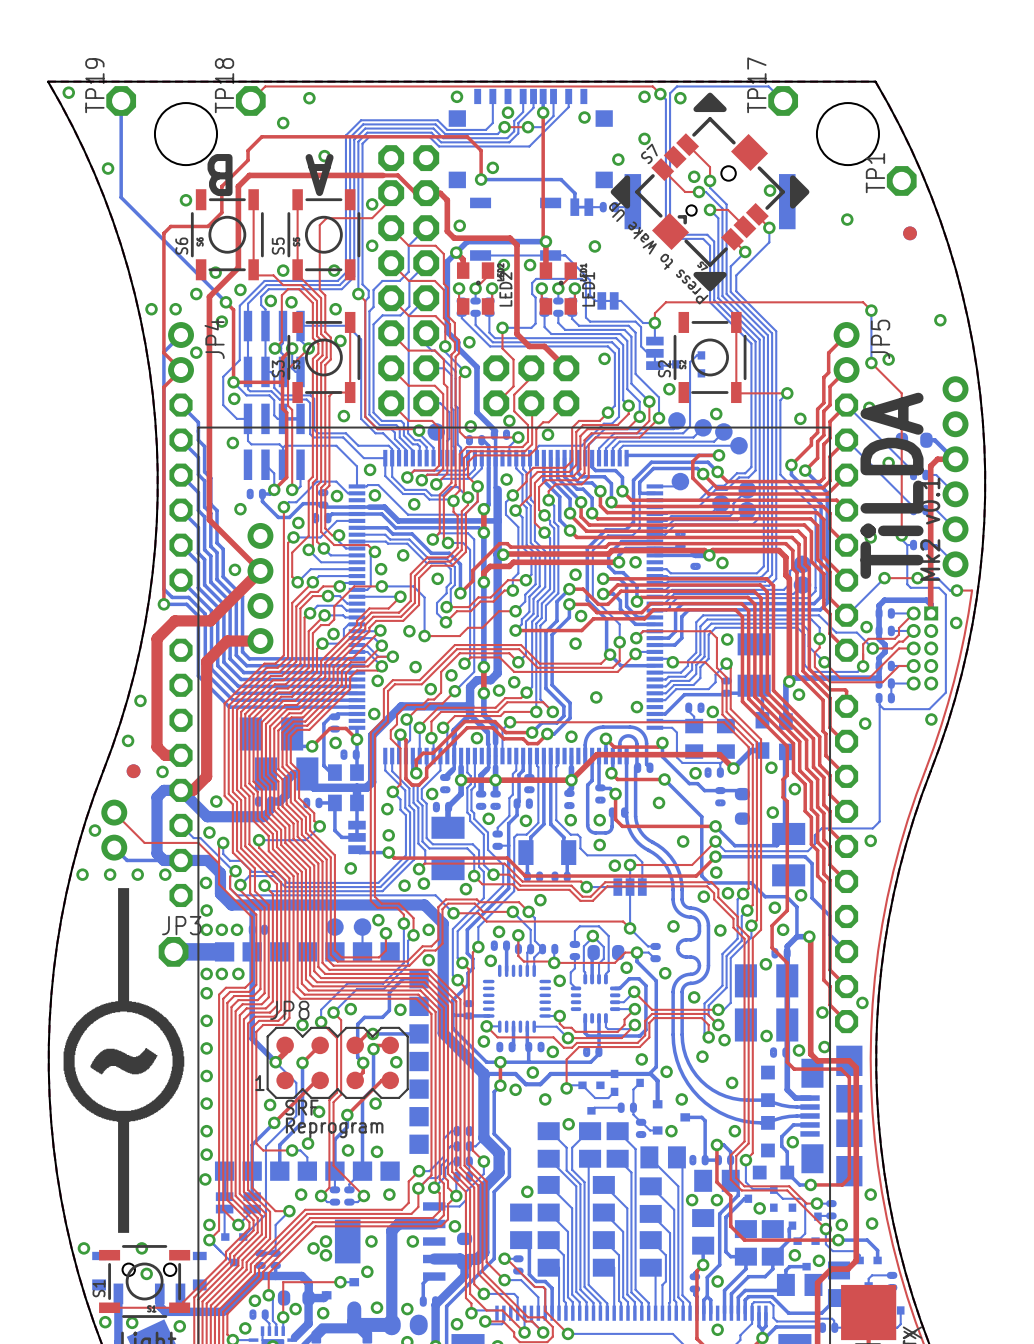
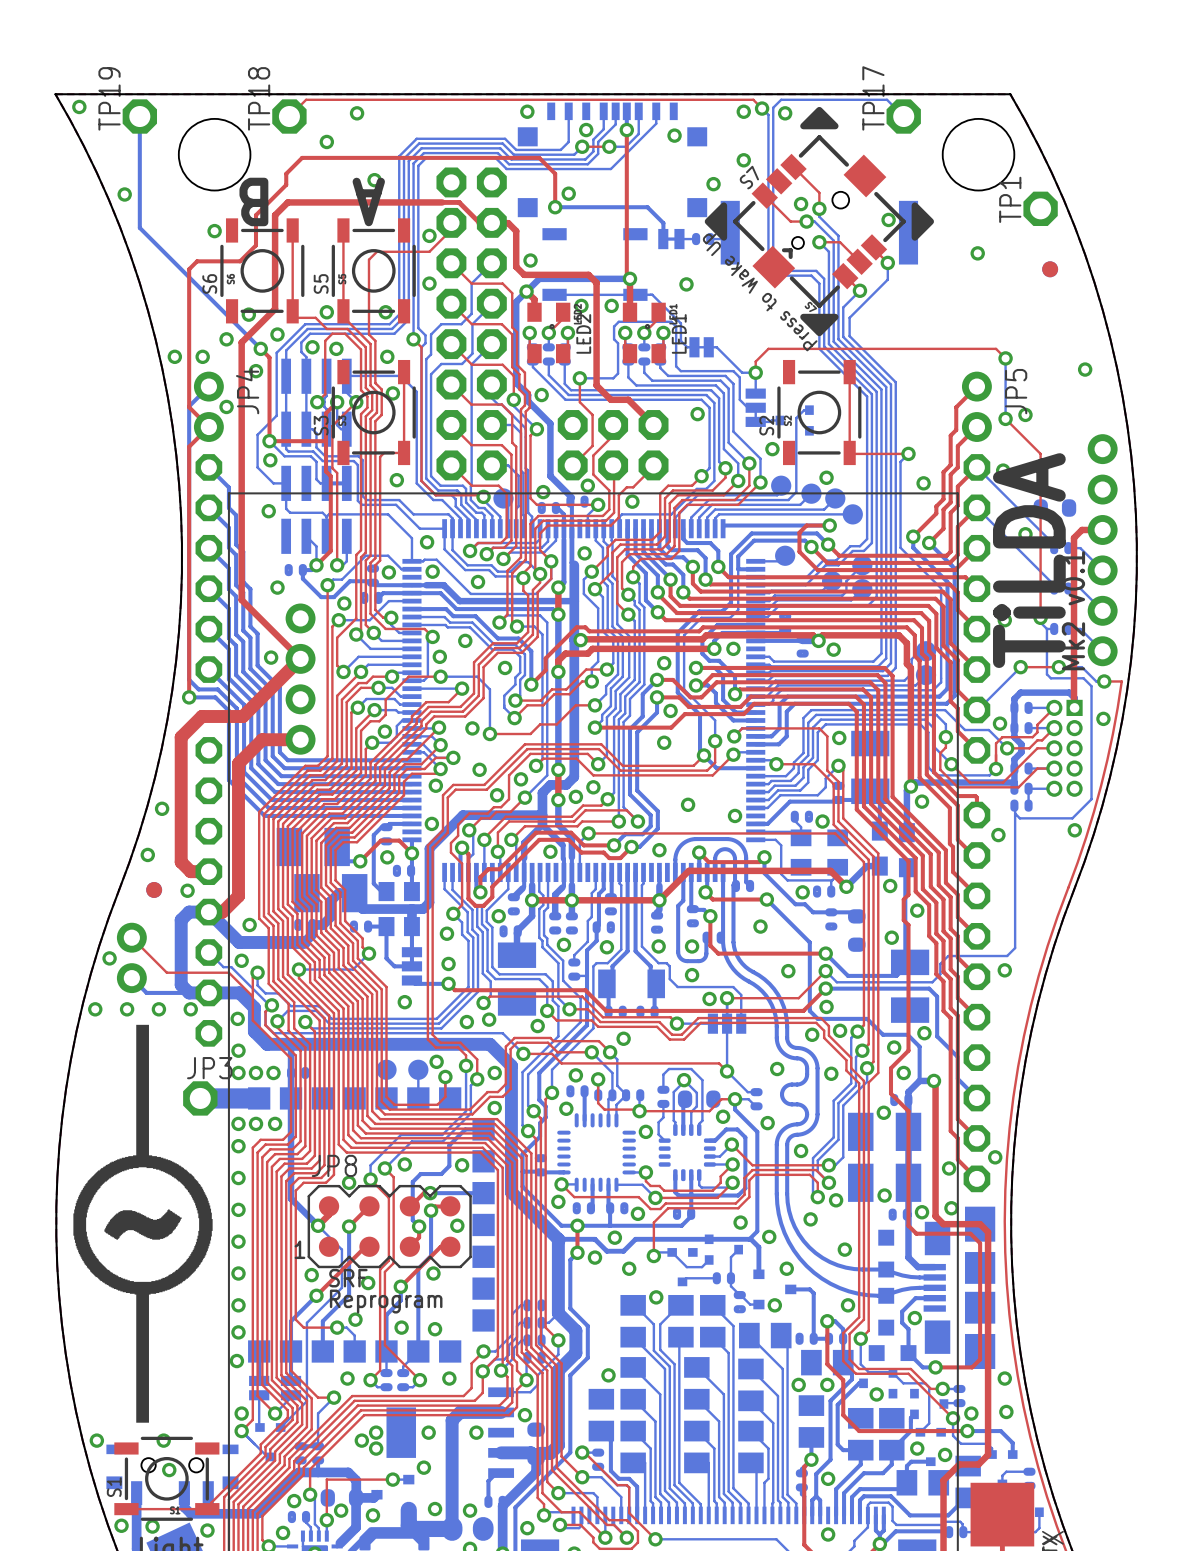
bottom track: (926, 440) (934, 440) (955, 459) -> none

